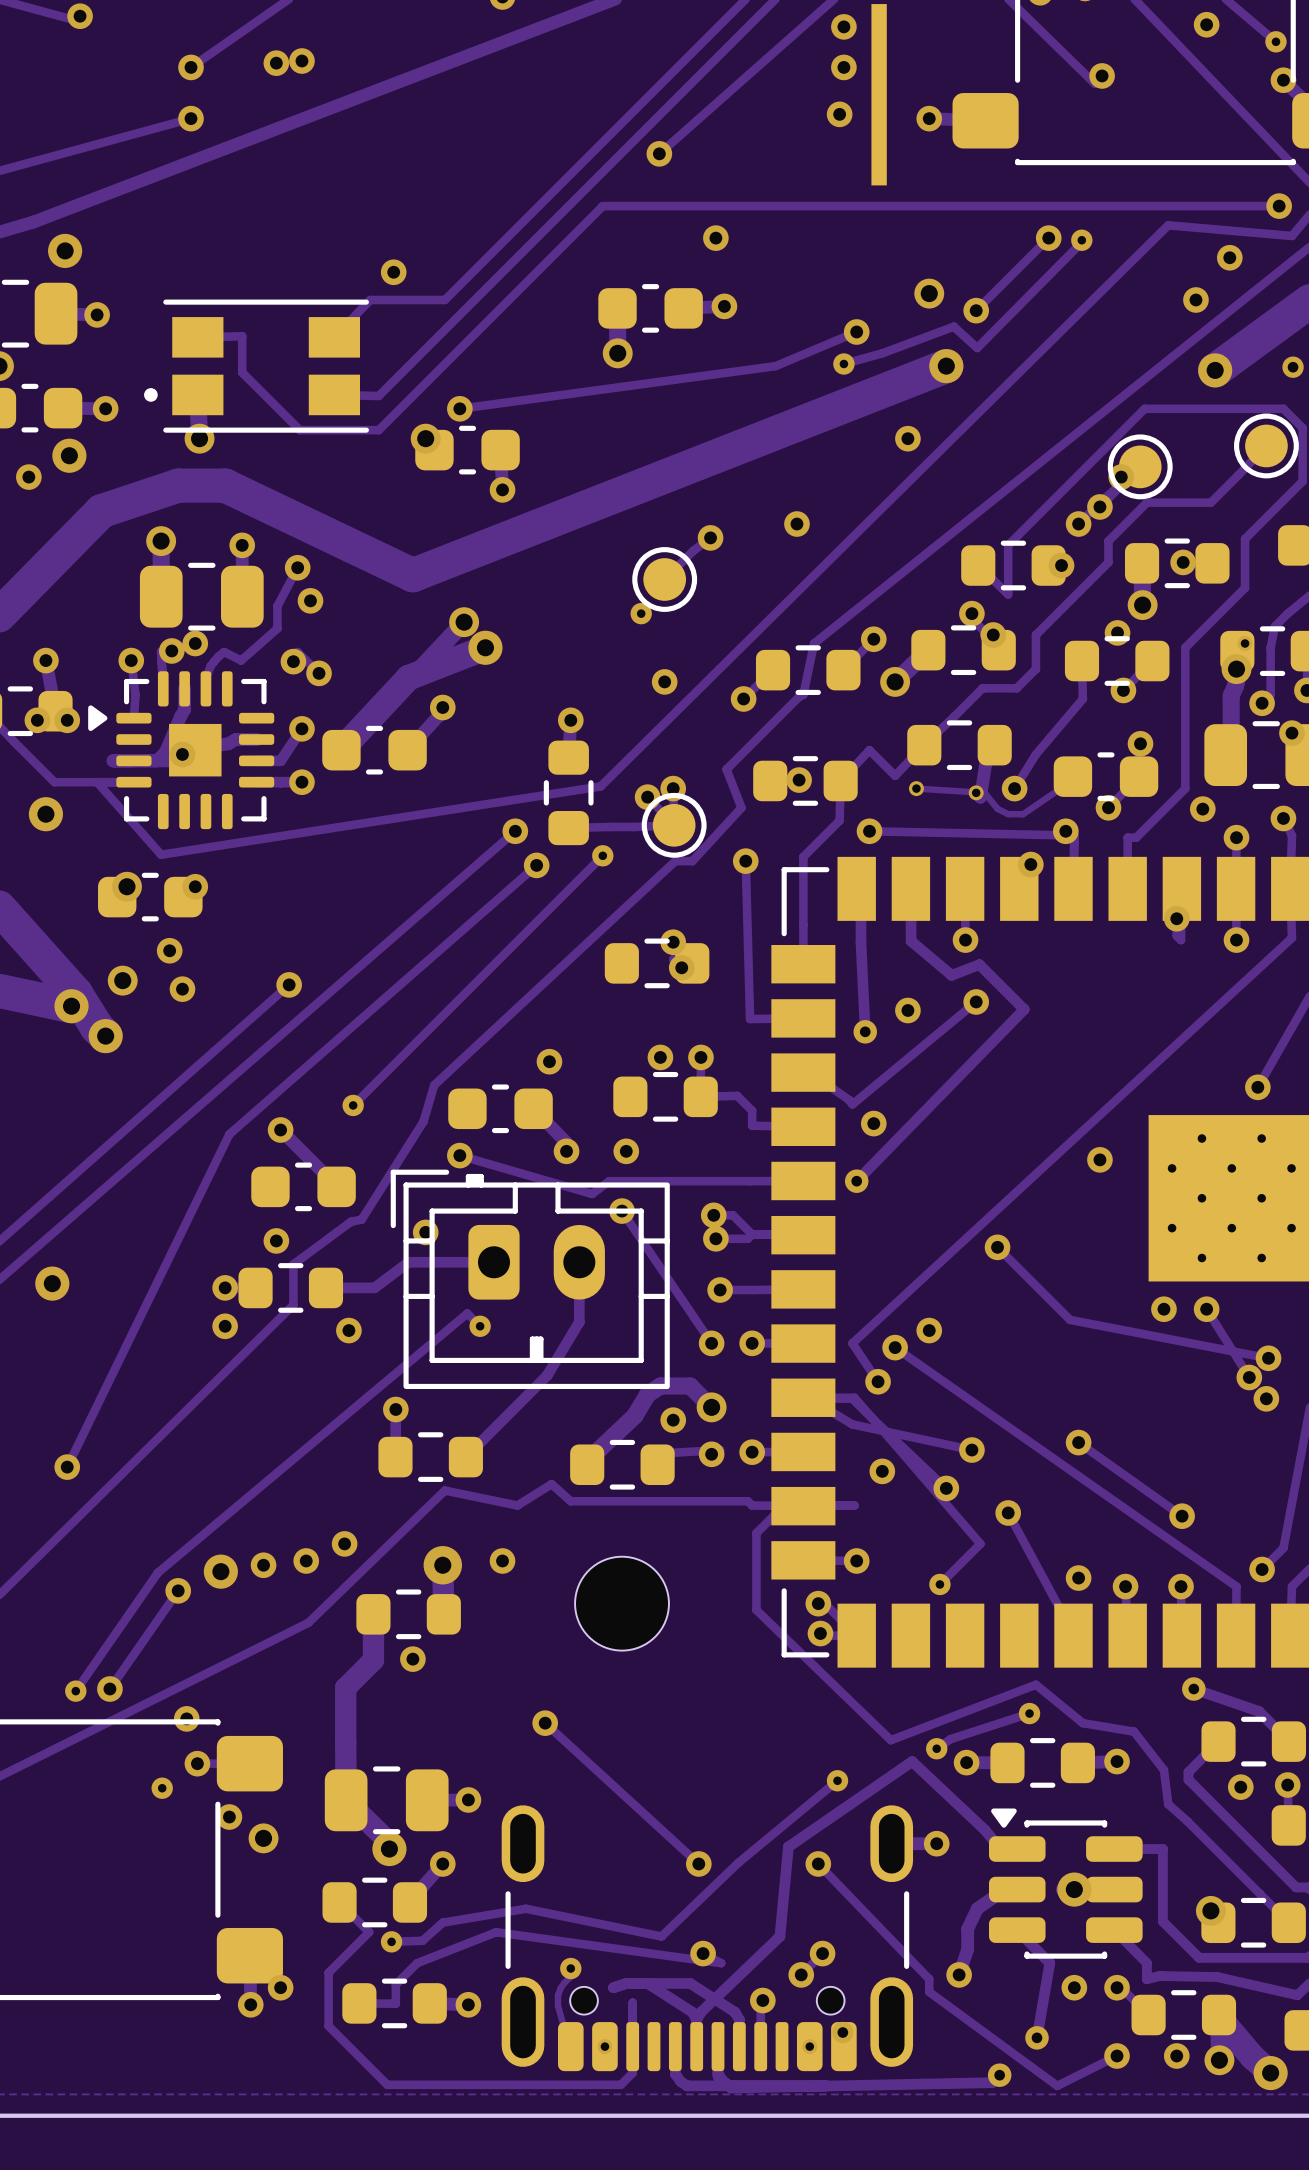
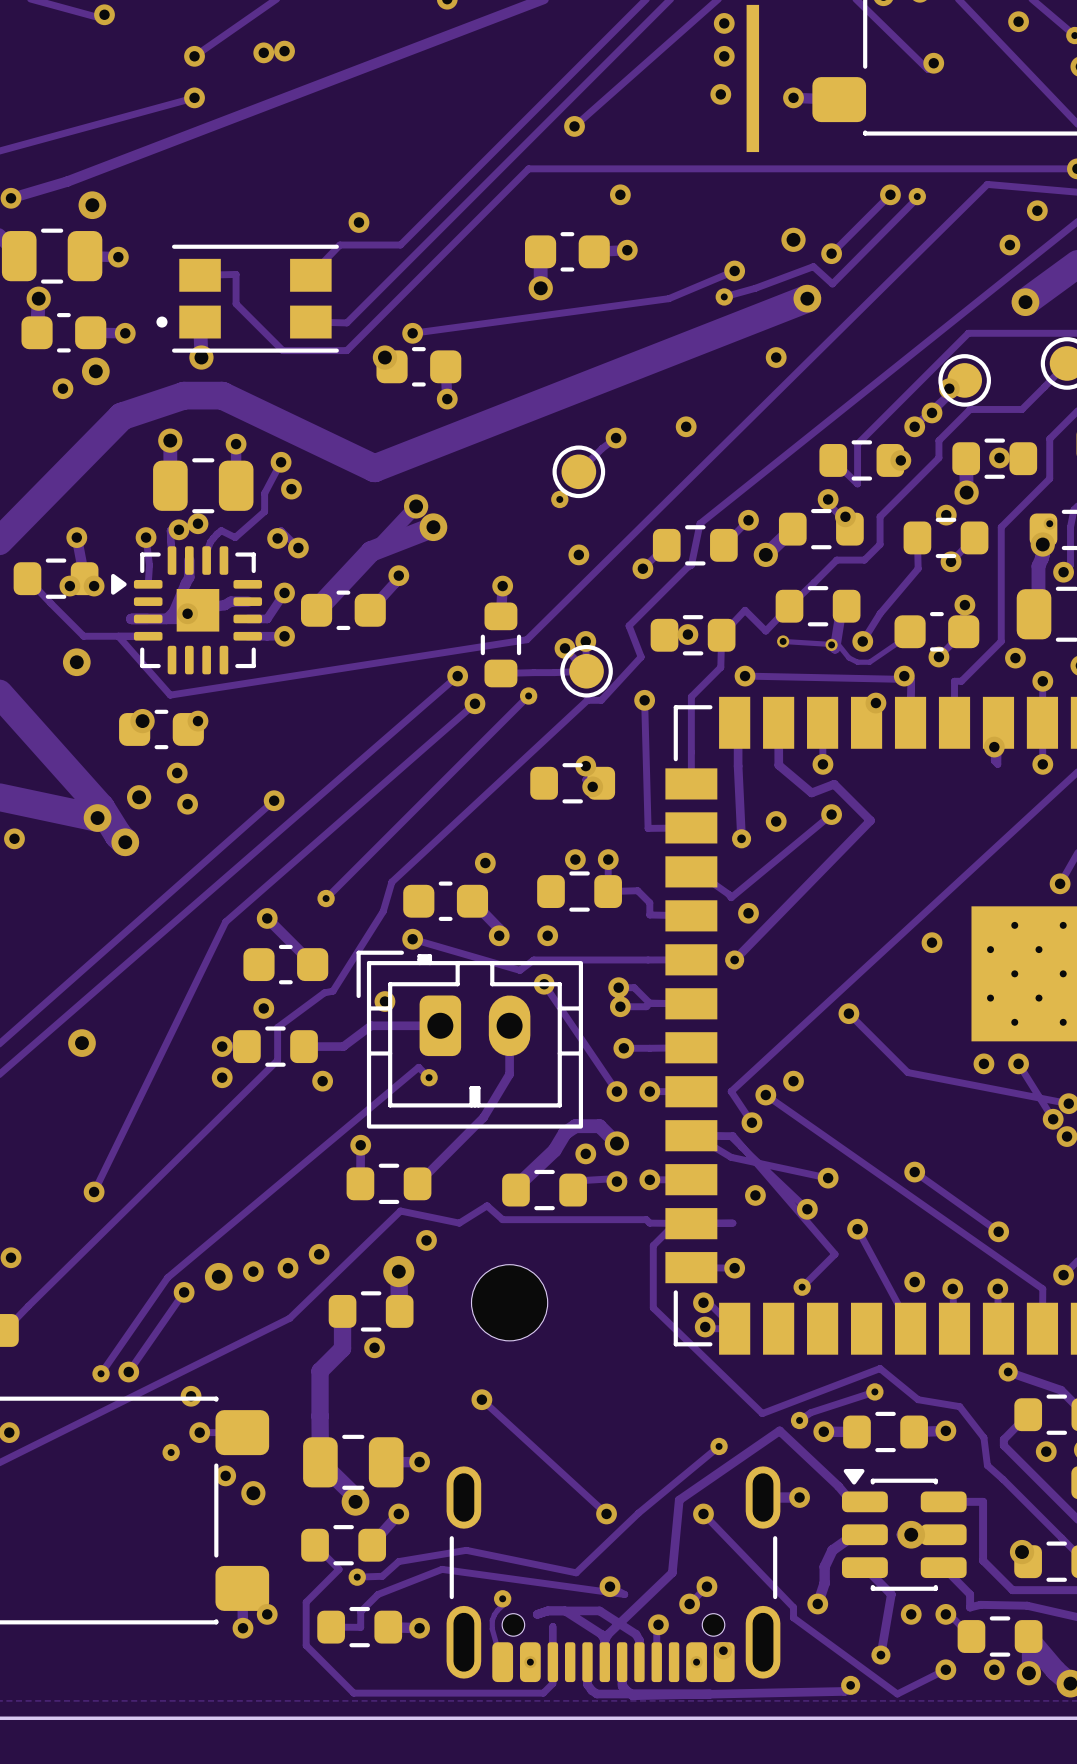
via position: (502, 1560) -> (426, 1240)
part position: (622, 1603) -> (509, 1302)

